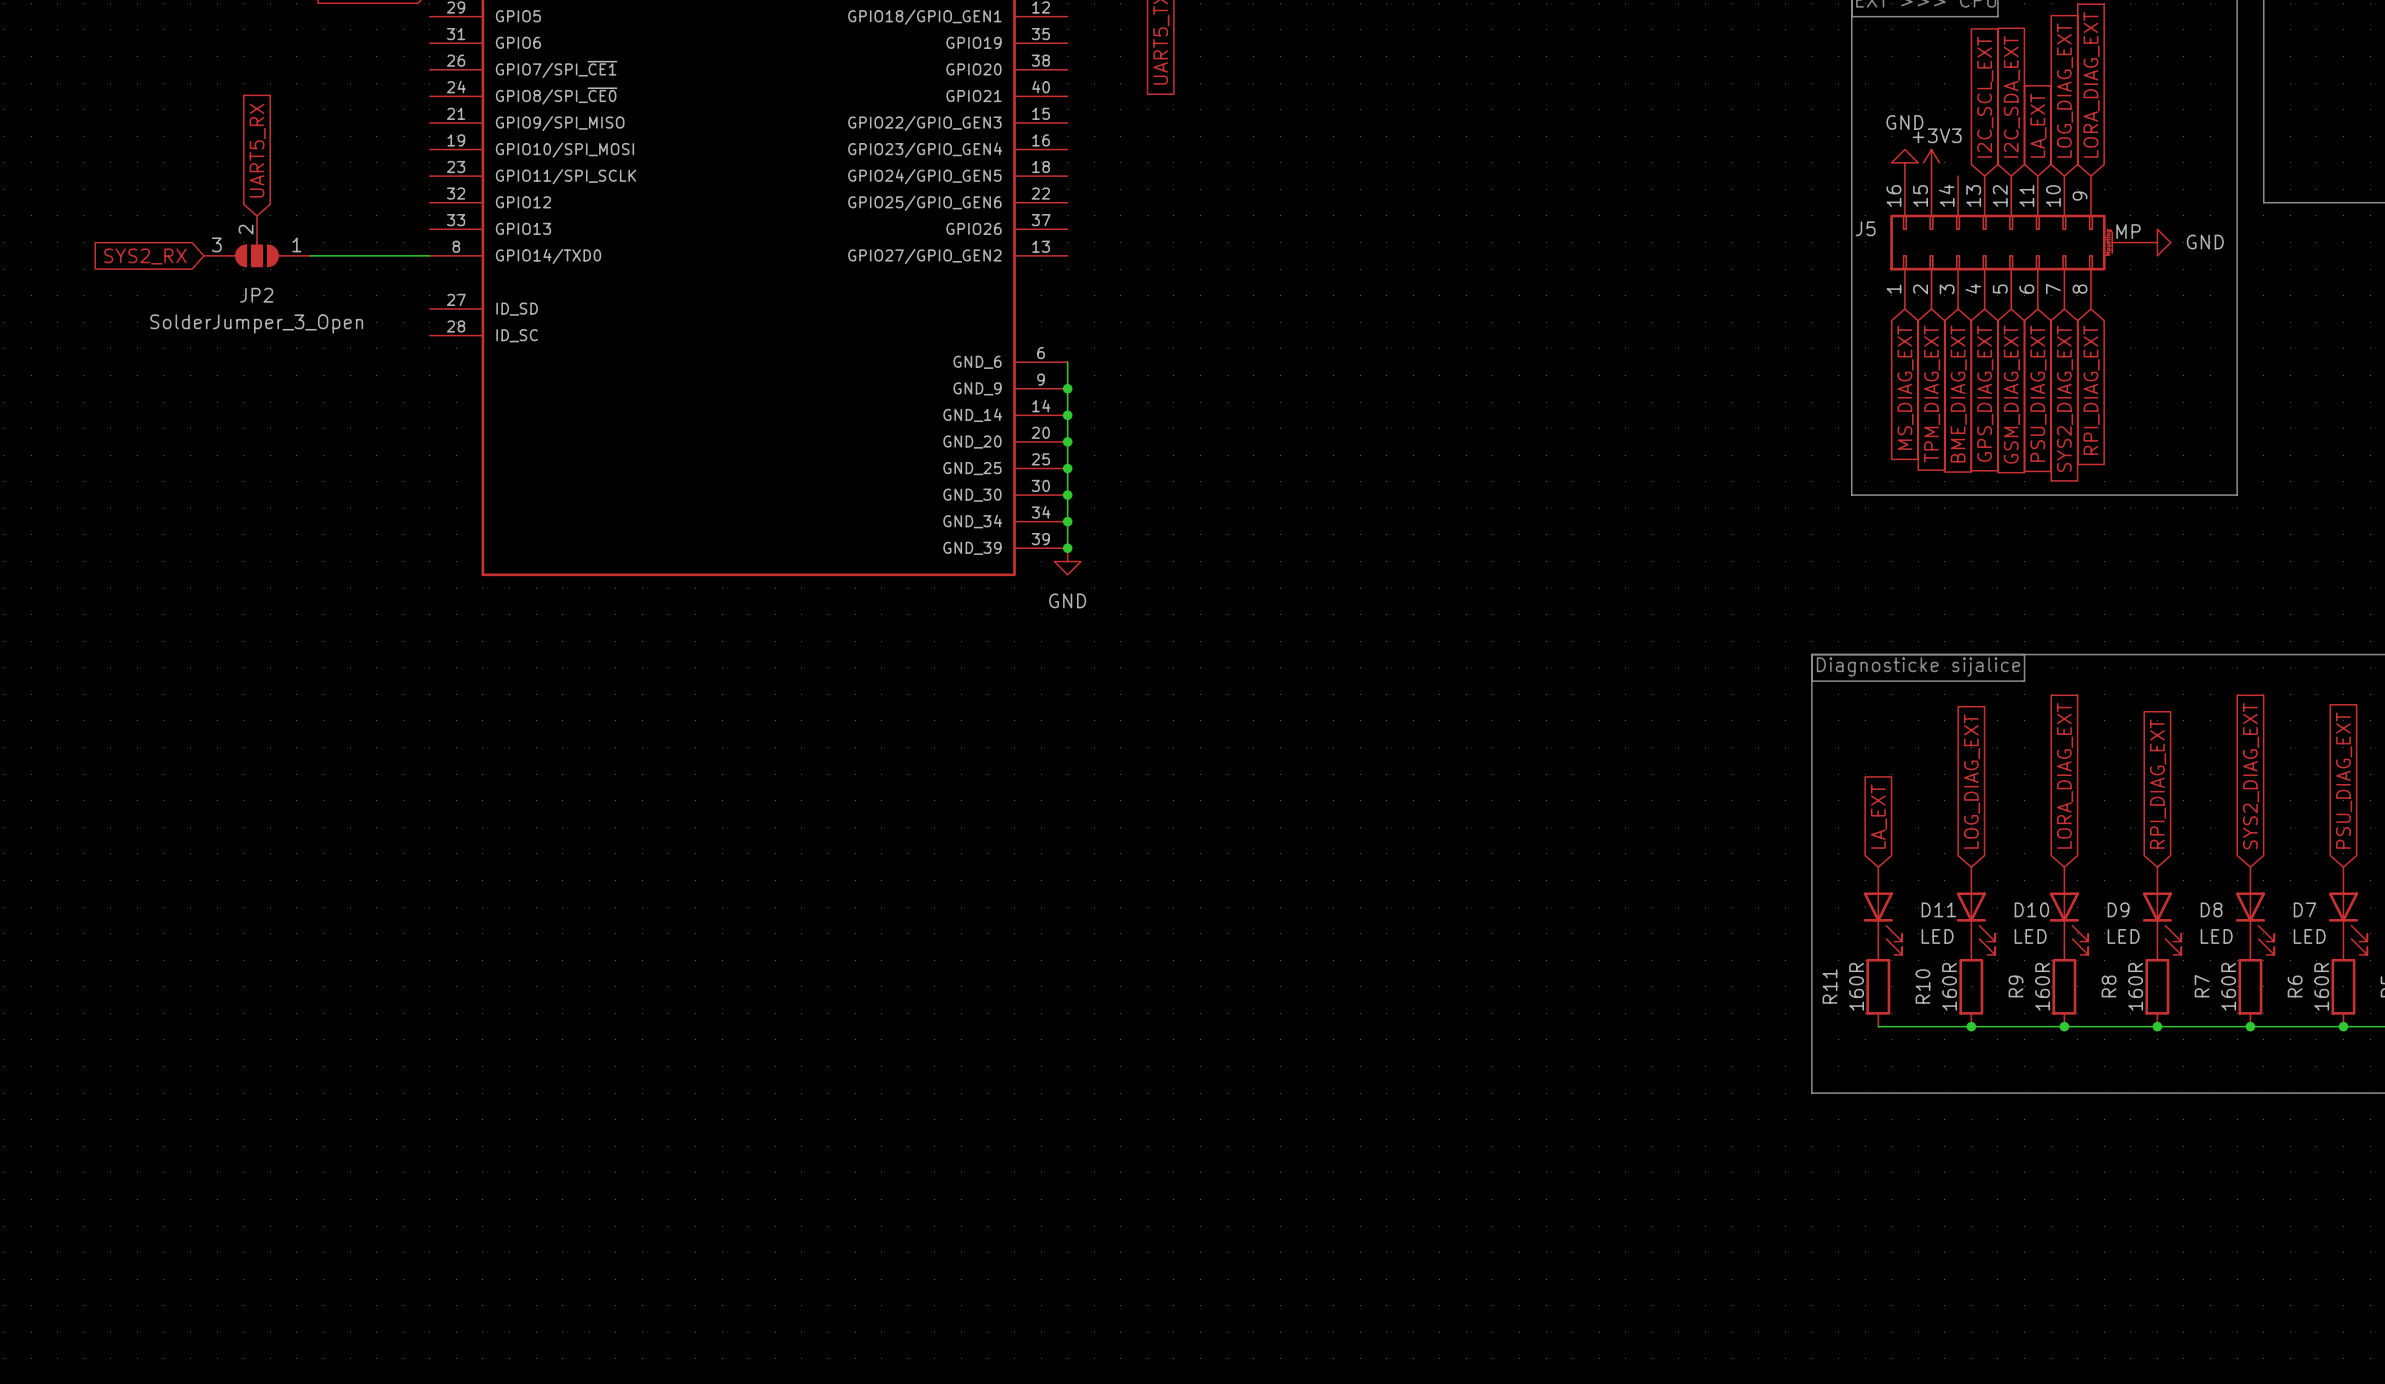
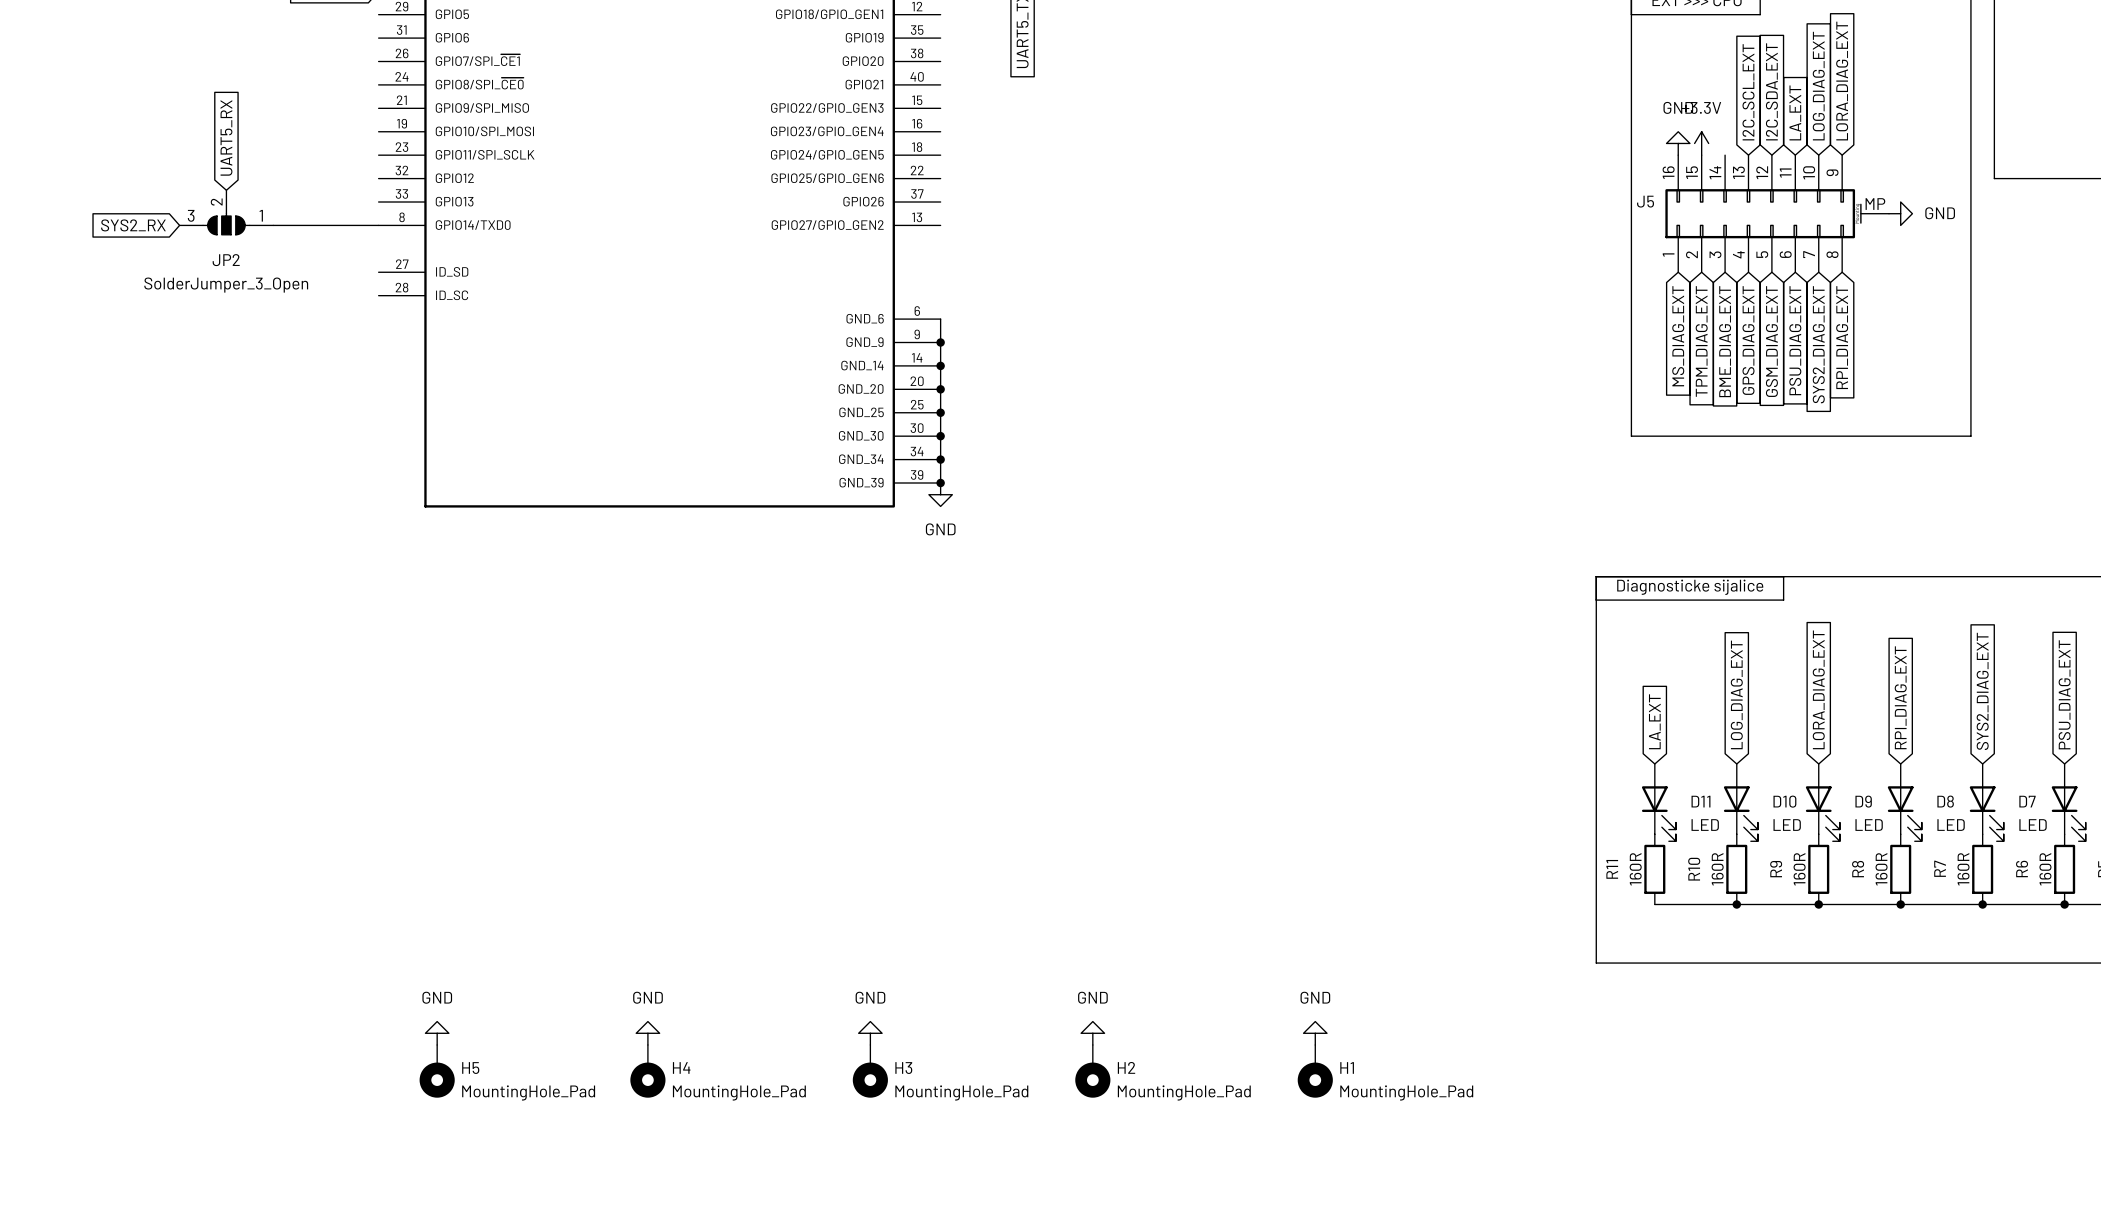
power symbol: +3V3 (1931, 162) -> +3.3V (1701, 143)
power symbol: none -> GND (437, 1033)
power symbol: none -> GND (647, 1033)
power symbol: none -> GND (870, 1033)
power symbol: none -> GND (1092, 1033)
power symbol: none -> GND (1315, 1033)
H5: none -> MountingHole_Pad (437, 1071)
H4: none -> MountingHole_Pad (647, 1071)
H3: none -> MountingHole_Pad (870, 1071)
H2: none -> MountingHole_Pad (1092, 1071)
H1: none -> MountingHole_Pad (1315, 1071)

